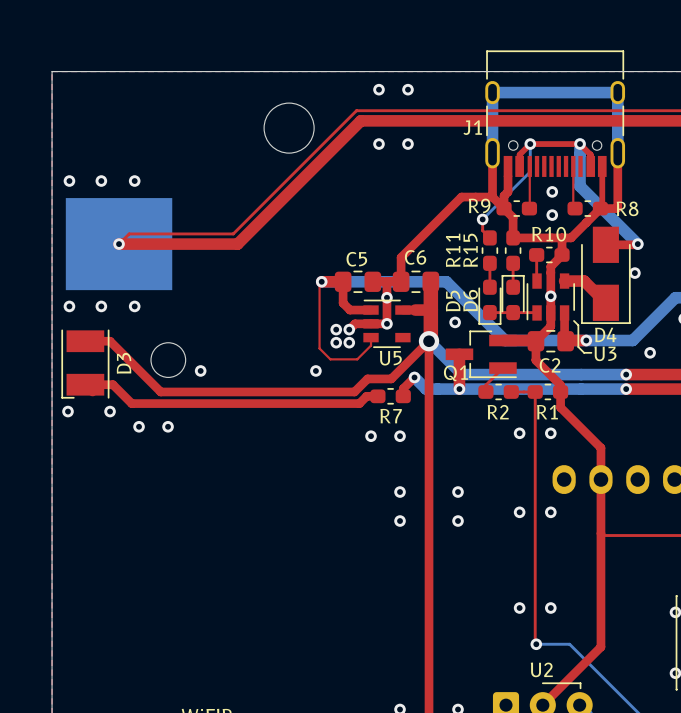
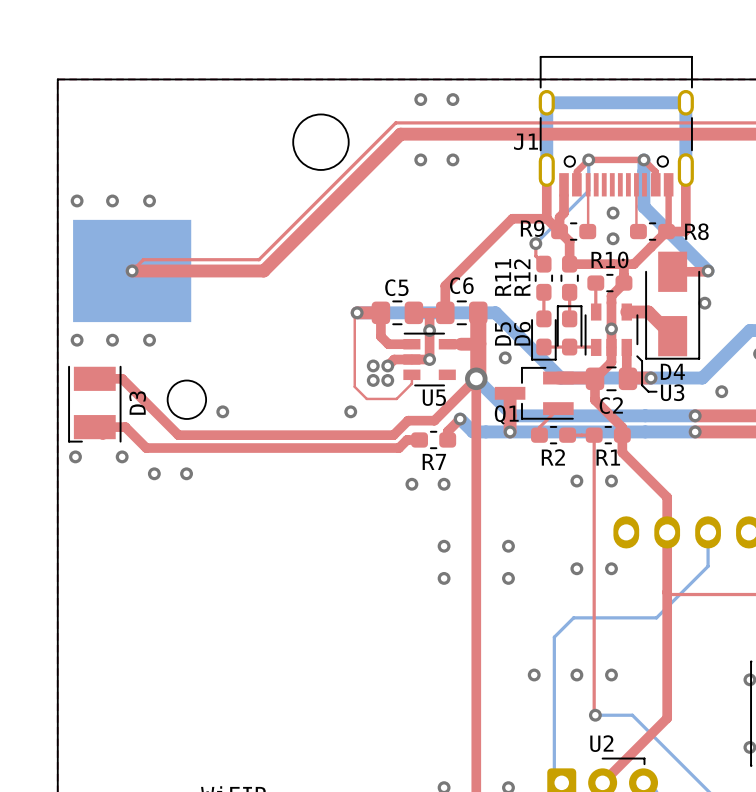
R15 name: R15 (470, 250) -> R12 (522, 277)
bottom track: none -> (708, 532) (708, 566) (656, 617) (573, 617) (554, 637) (554, 780)
via: none -> (534, 674)

